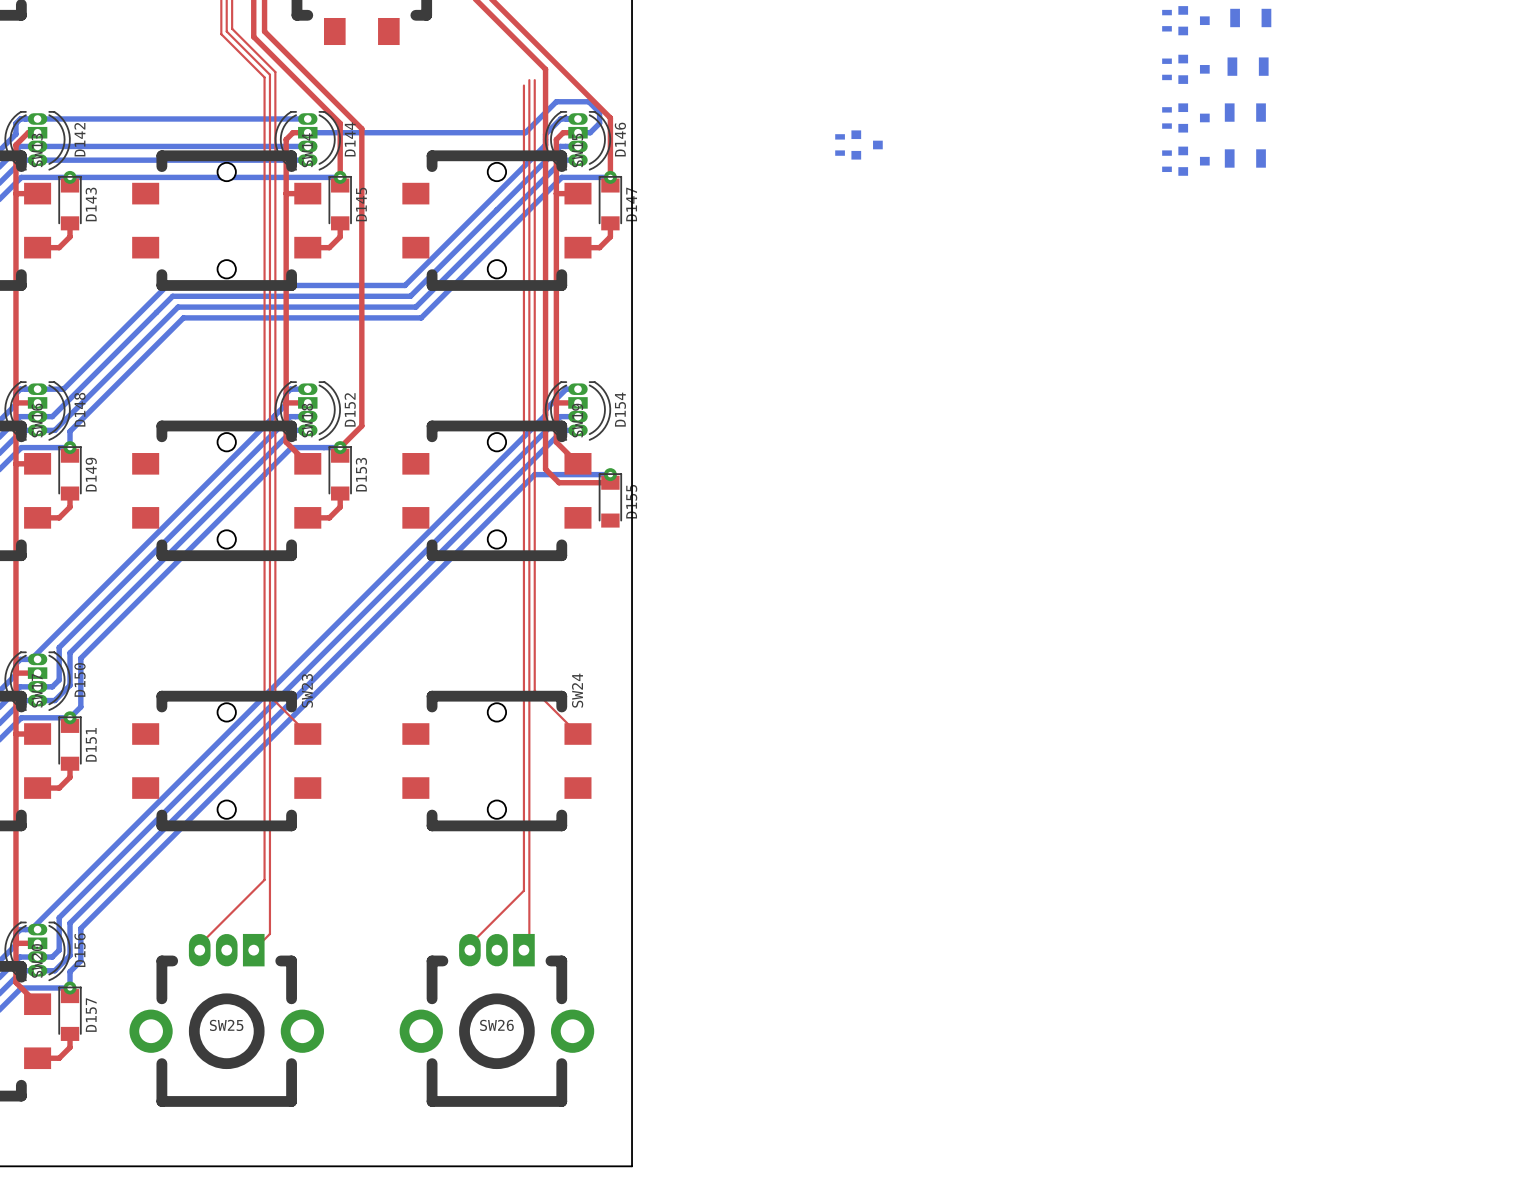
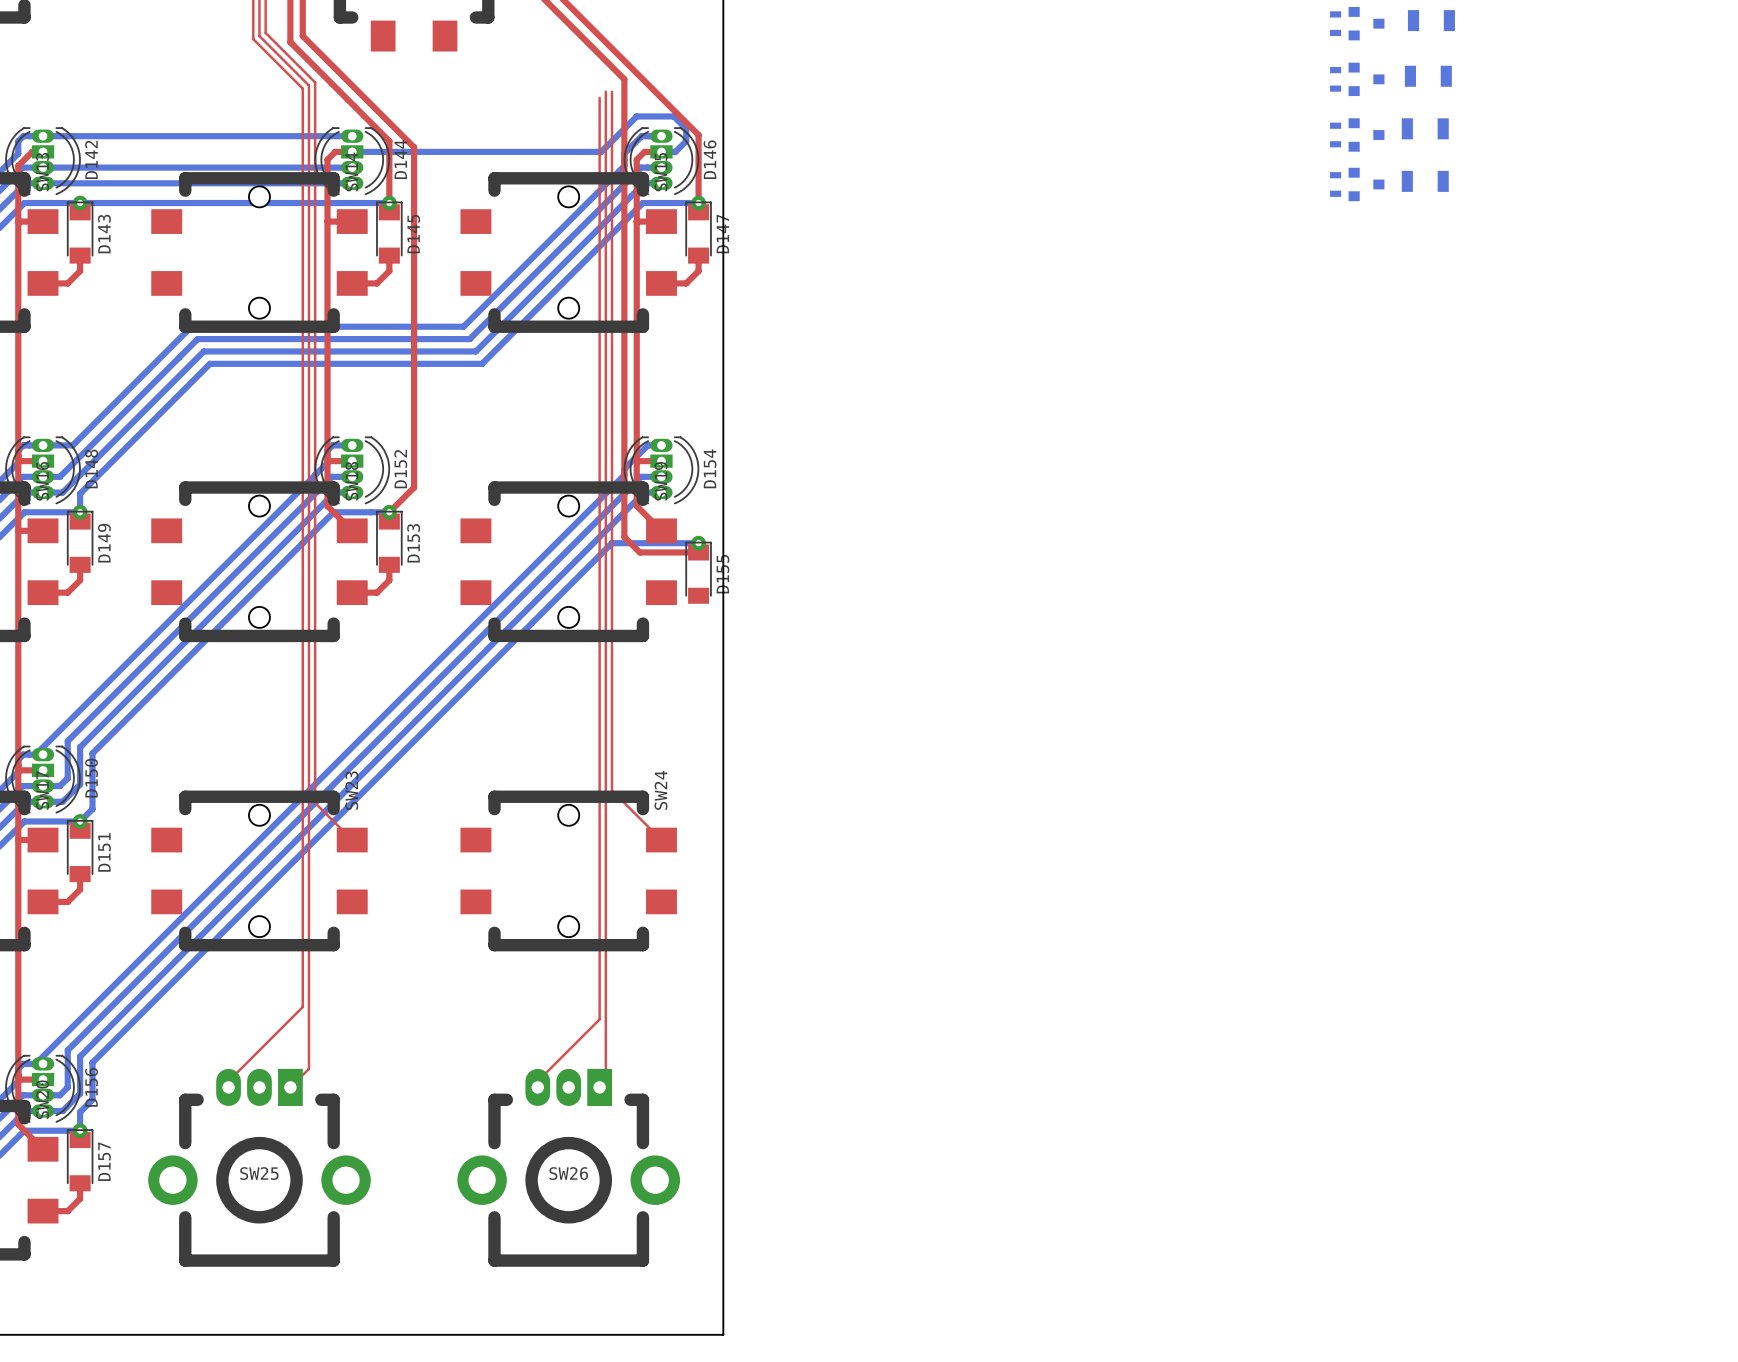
part: (840, 144) -> none
part: (867, 144) -> none

